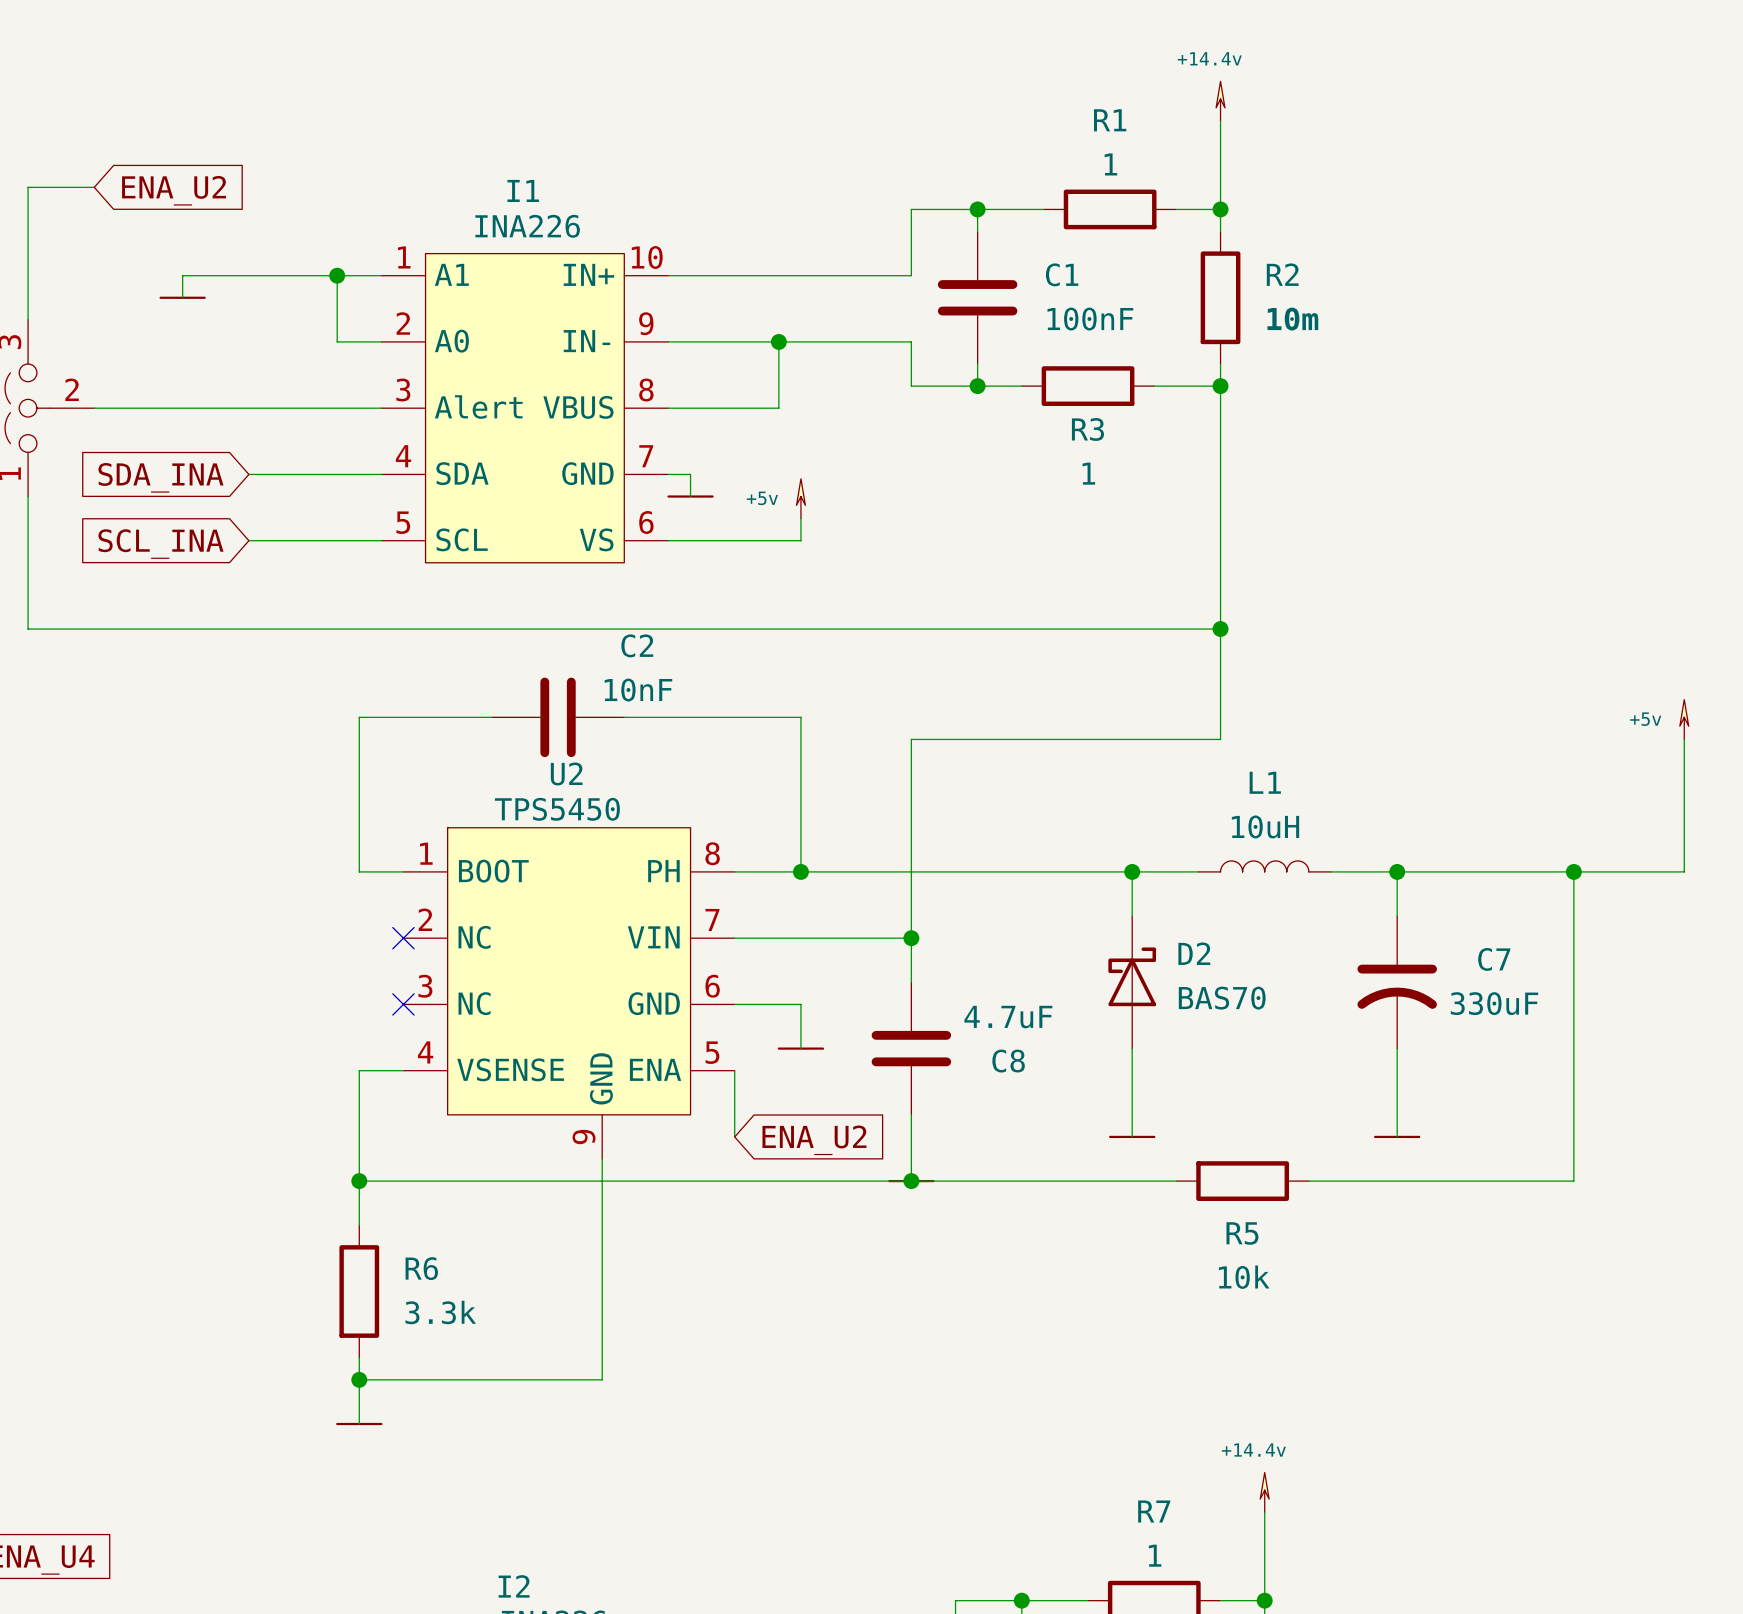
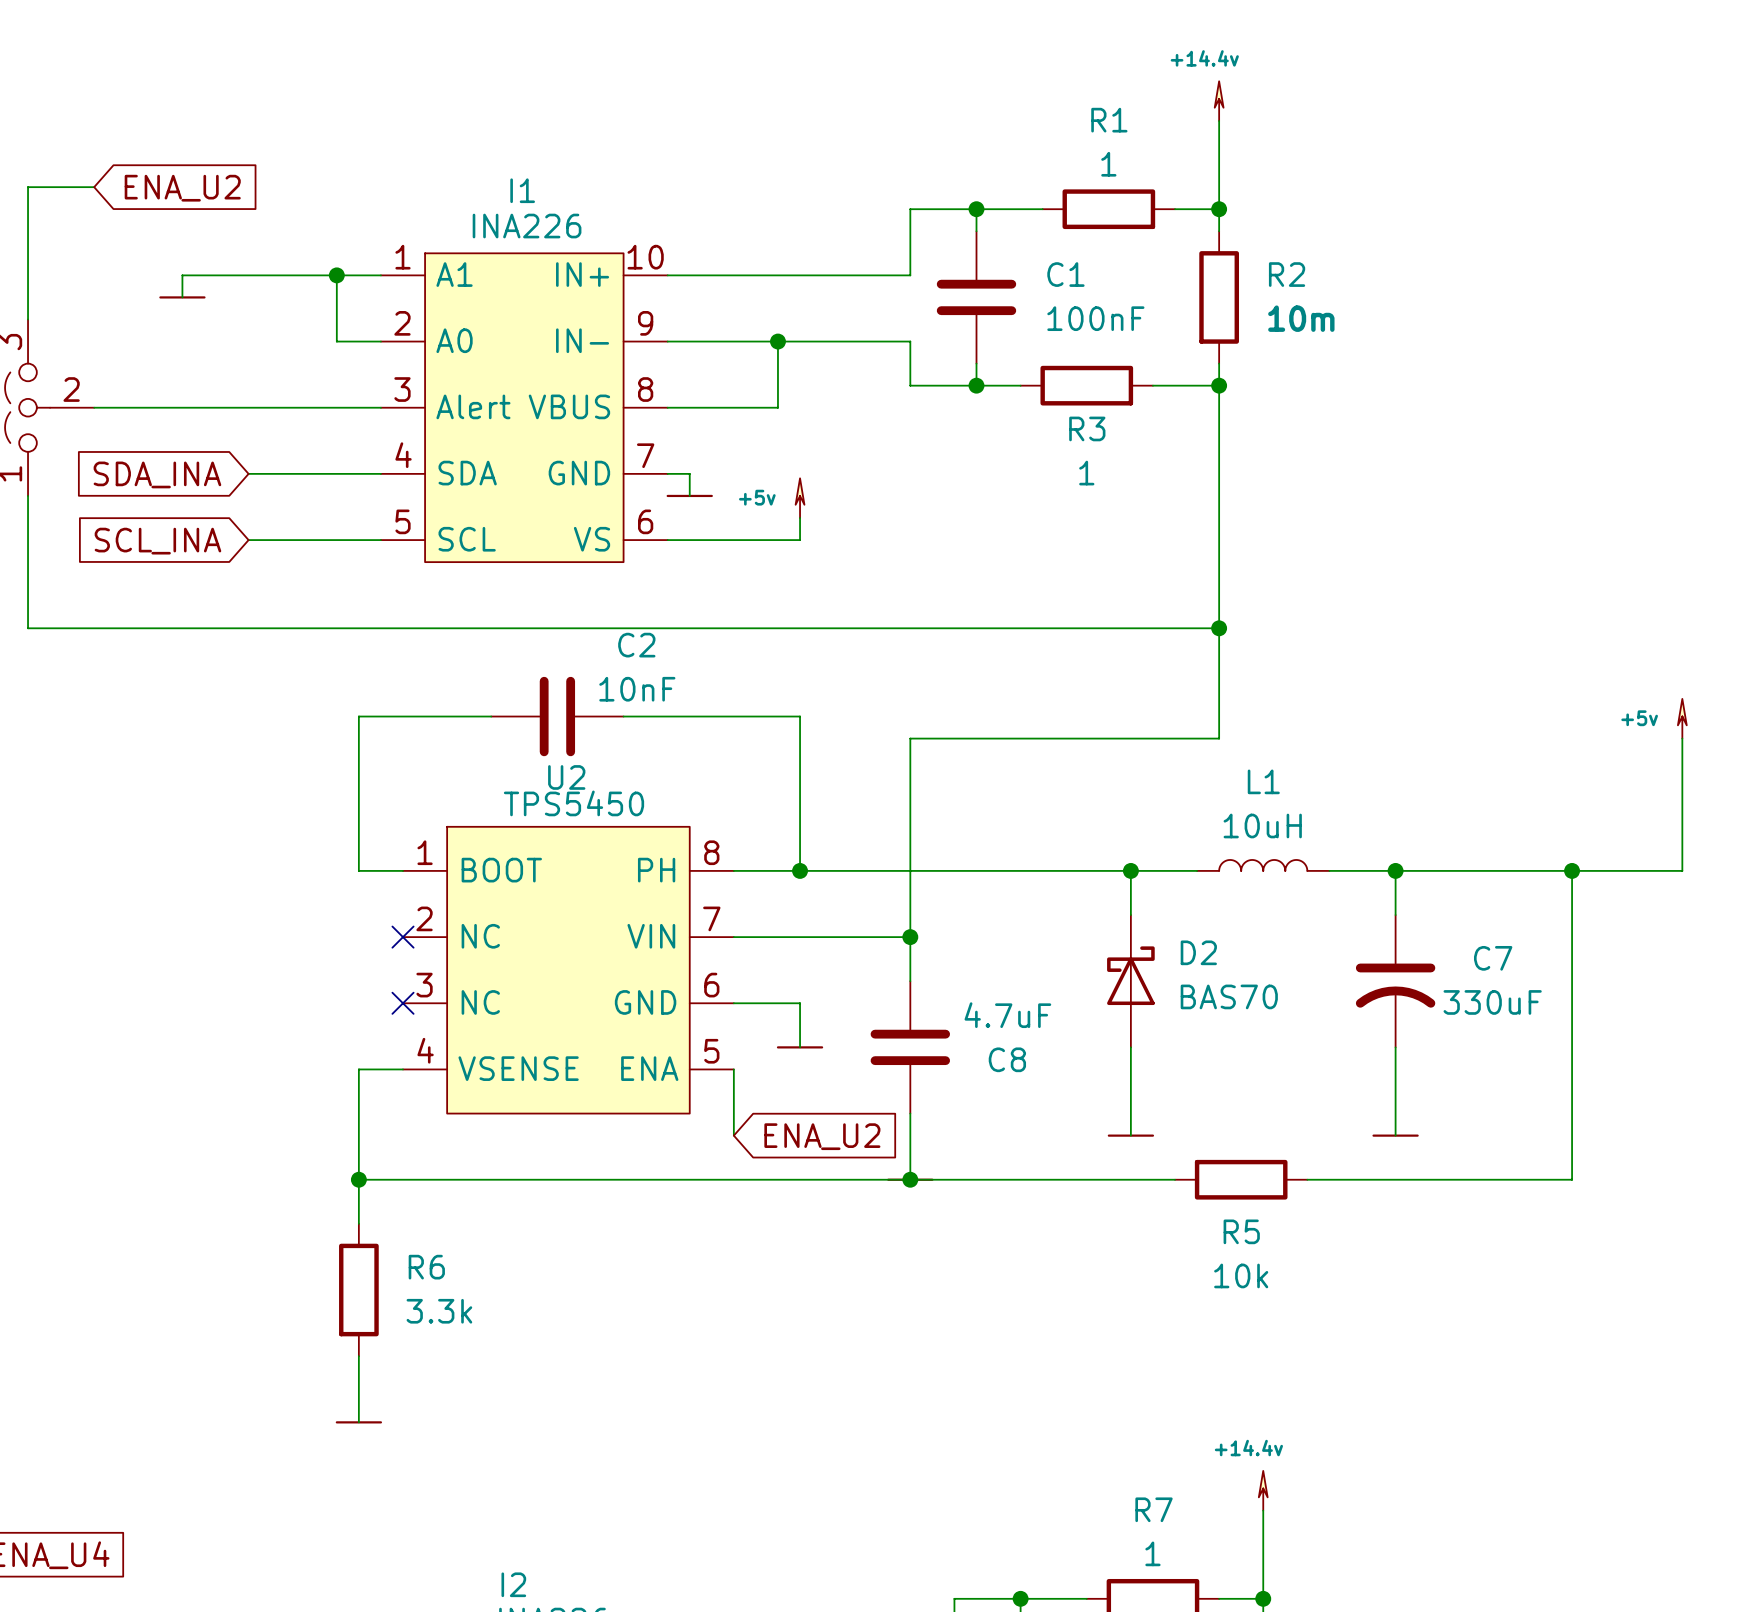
U2 symbol: [403, 827, 735, 1160] -> [403, 826, 734, 1114]
wire: (602, 1159) (602, 1379) (359, 1379) -> none
junction: (359, 1379) -> none

